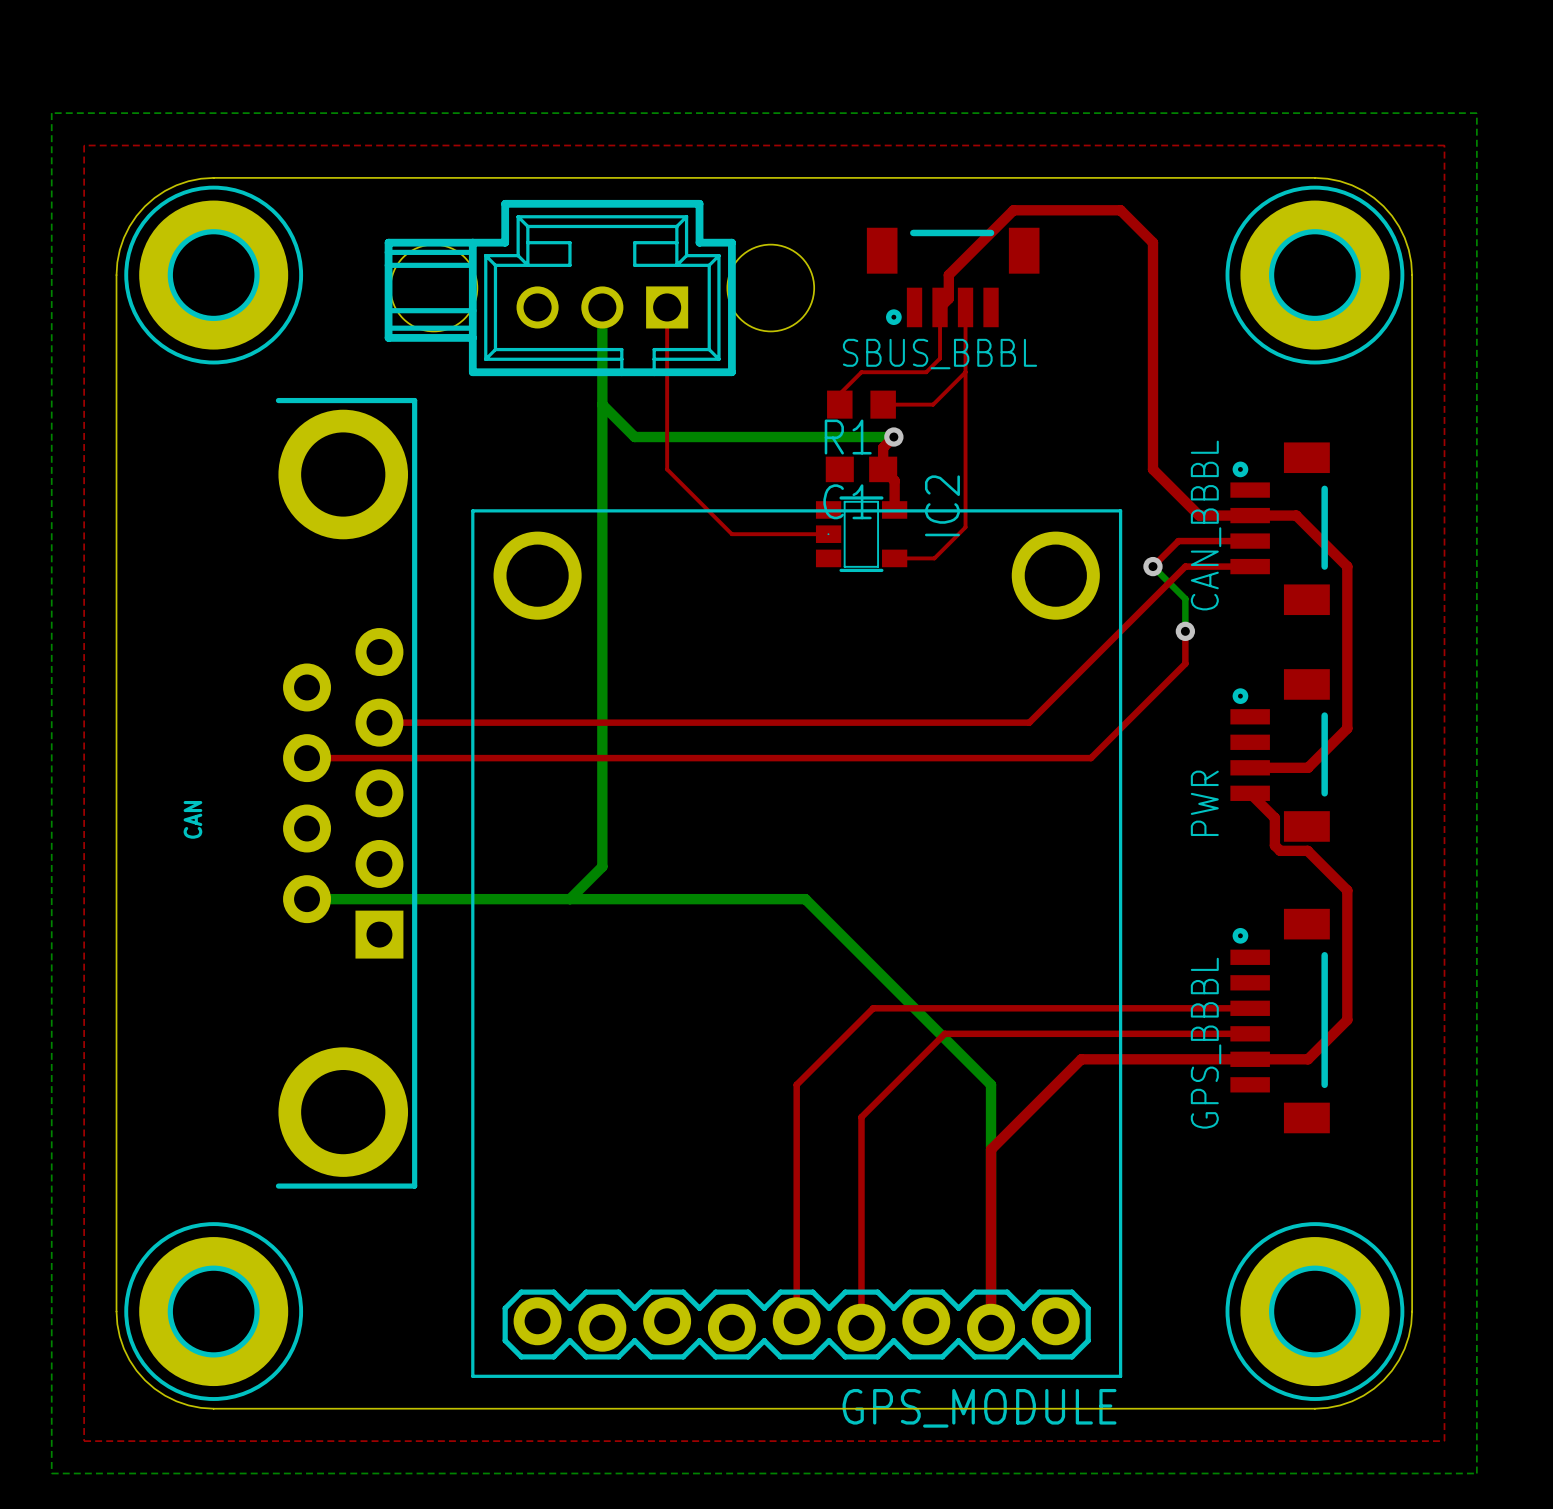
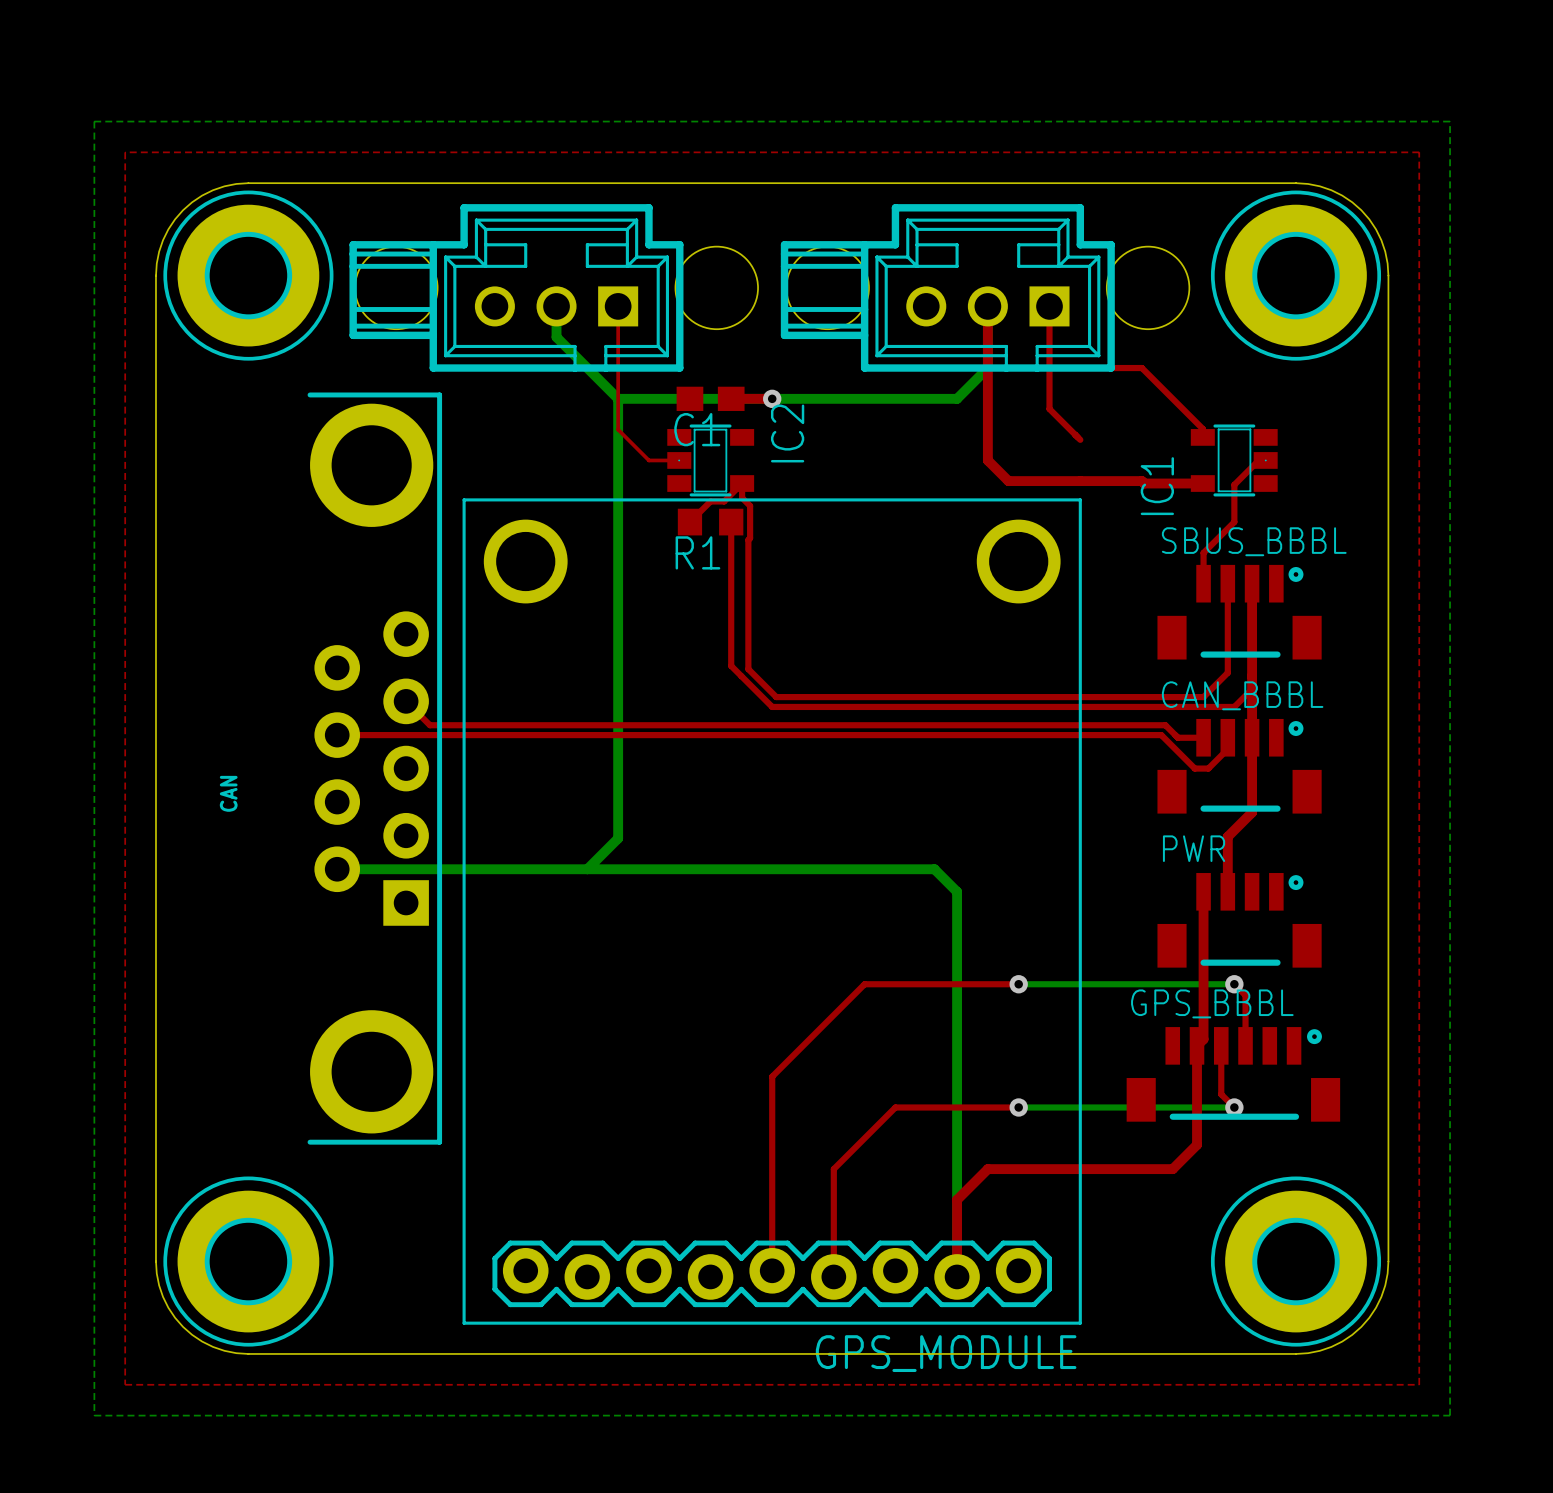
SBUS_BBBL rotation: 0° (953, 277) -> 180° (1239, 612)
SBUS_BBBL position: (953, 277) -> (1239, 612)
part position: (599, 288) -> (553, 287)
part: none -> (985, 287)
bottom track: none -> (556, 306) (556, 337) (618, 398) (957, 398) (987, 368) (987, 306)
top track: none -> (618, 306) (618, 429) (648, 460) (679, 460)
bottom track: (602, 307) (602, 404) (634, 437) (893, 437) -> none
top track: (667, 307) (667, 469) (731, 534) (828, 534) -> none
top track: (965, 307) (965, 527) (934, 558) (894, 558) -> none
top track: none -> (987, 306) (987, 460) (1008, 481) (1141, 481) (1144, 483) (1202, 483)
top track: none -> (1049, 306) (1049, 409) (1080, 439)
top track: (965, 372) (933, 404) (883, 404) -> none
top track: none -> (1049, 368) (1141, 368) (1202, 428) (1202, 437)
top track: none -> (772, 398) (741, 398) (736, 403)
top track: (839, 404) (839, 393) (861, 372) (926, 372) (940, 358) (940, 307) (948, 298) (948, 275) (1013, 210) (1120, 210) (1152, 242) (1152, 469) (1199, 515) (1296, 515) (1347, 566) (1347, 728) (1308, 767) (1250, 767) -> none
R1 position: (861, 404) -> (710, 522)
top track: (893, 437) (883, 447) (883, 469) (894, 480) (894, 509) -> none
via position: (893, 437) -> (772, 398)
C1 position: (861, 469) -> (710, 398)
IC1: none -> (1234, 460)
top track: none -> (1265, 460) (1258, 460) (1234, 484) (1234, 522) (1203, 552) (1203, 583)
CAN_BBBL rotation: 0° (1280, 528) -> 90° clockwise (1239, 766)
CAN_BBBL position: (1280, 528) -> (1239, 766)
top track: none -> (689, 522) (710, 501) (724, 501) (742, 483) (742, 497) (750, 505) (748, 669) (776, 697) (1203, 697) (1227, 672) (1227, 583)
top track: none -> (731, 522) (731, 665) (772, 706) (1234, 706) (1252, 689) (1252, 676)
IC2 position: (861, 534) -> (710, 460)
top track: (1250, 541) (1178, 541) (1152, 566) -> none
bottom track: (1152, 566) (1185, 598) (1185, 631) -> none
via: (1152, 566) -> none
top track: (1250, 566) (1185, 566) (1029, 722) (379, 722) -> (1203, 737) (1177, 737) (1165, 725) (429, 725) (406, 701)
top track: none -> (1252, 583) (1252, 812) (1227, 836) (1227, 891)
top track: (1185, 631) (1185, 663) (1091, 758) -> (1227, 737) (1227, 749) (1208, 768) (1194, 768) (1161, 735) (1082, 735)
via: (1185, 631) -> none
PWR rotation: 0° (1280, 755) -> 90° clockwise (1239, 920)
PWR position: (1280, 755) -> (1239, 920)
top track: (1250, 793) (1274, 818) (1274, 845) (1280, 850) (1307, 850) (1347, 890) (1347, 1020) (1308, 1059) (1081, 1059) (991, 1149) (991, 1327) -> none
bottom track: (805, 899) (991, 1084) (991, 1327) -> (811, 869) (934, 869) (957, 891) (957, 1276)
top track: none -> (1203, 891) (1203, 1039) (1197, 1045) (1197, 1144) (1172, 1169) (987, 1169) (957, 1199) (957, 1276)
GPS_MODULE position: (796, 943) -> (772, 911)
top track: (1250, 1008) (873, 1008) (861, 1020) -> (1018, 984) (864, 984)
bottom track: none -> (1018, 984) (1234, 984)
via: none -> (1018, 984)
top track: none -> (1234, 984) (1245, 995) (1245, 1045)
via: none -> (1234, 984)
GPS_BBBL rotation: 0° (1280, 1021) -> 90° clockwise (1233, 1074)
top track: (1250, 1033) (944, 1033) (861, 1117) (861, 1327) -> none
top track: (796, 1084) (796, 1321) -> (803, 1045) (772, 1076) (772, 1270)
top track: none -> (1221, 1045) (1221, 1094) (1234, 1107)
top track: none -> (1018, 1107) (895, 1107) (833, 1169) (833, 1276)
bottom track: none -> (1018, 1107) (1234, 1107)
via: none -> (1018, 1107)
via: none -> (1234, 1107)

